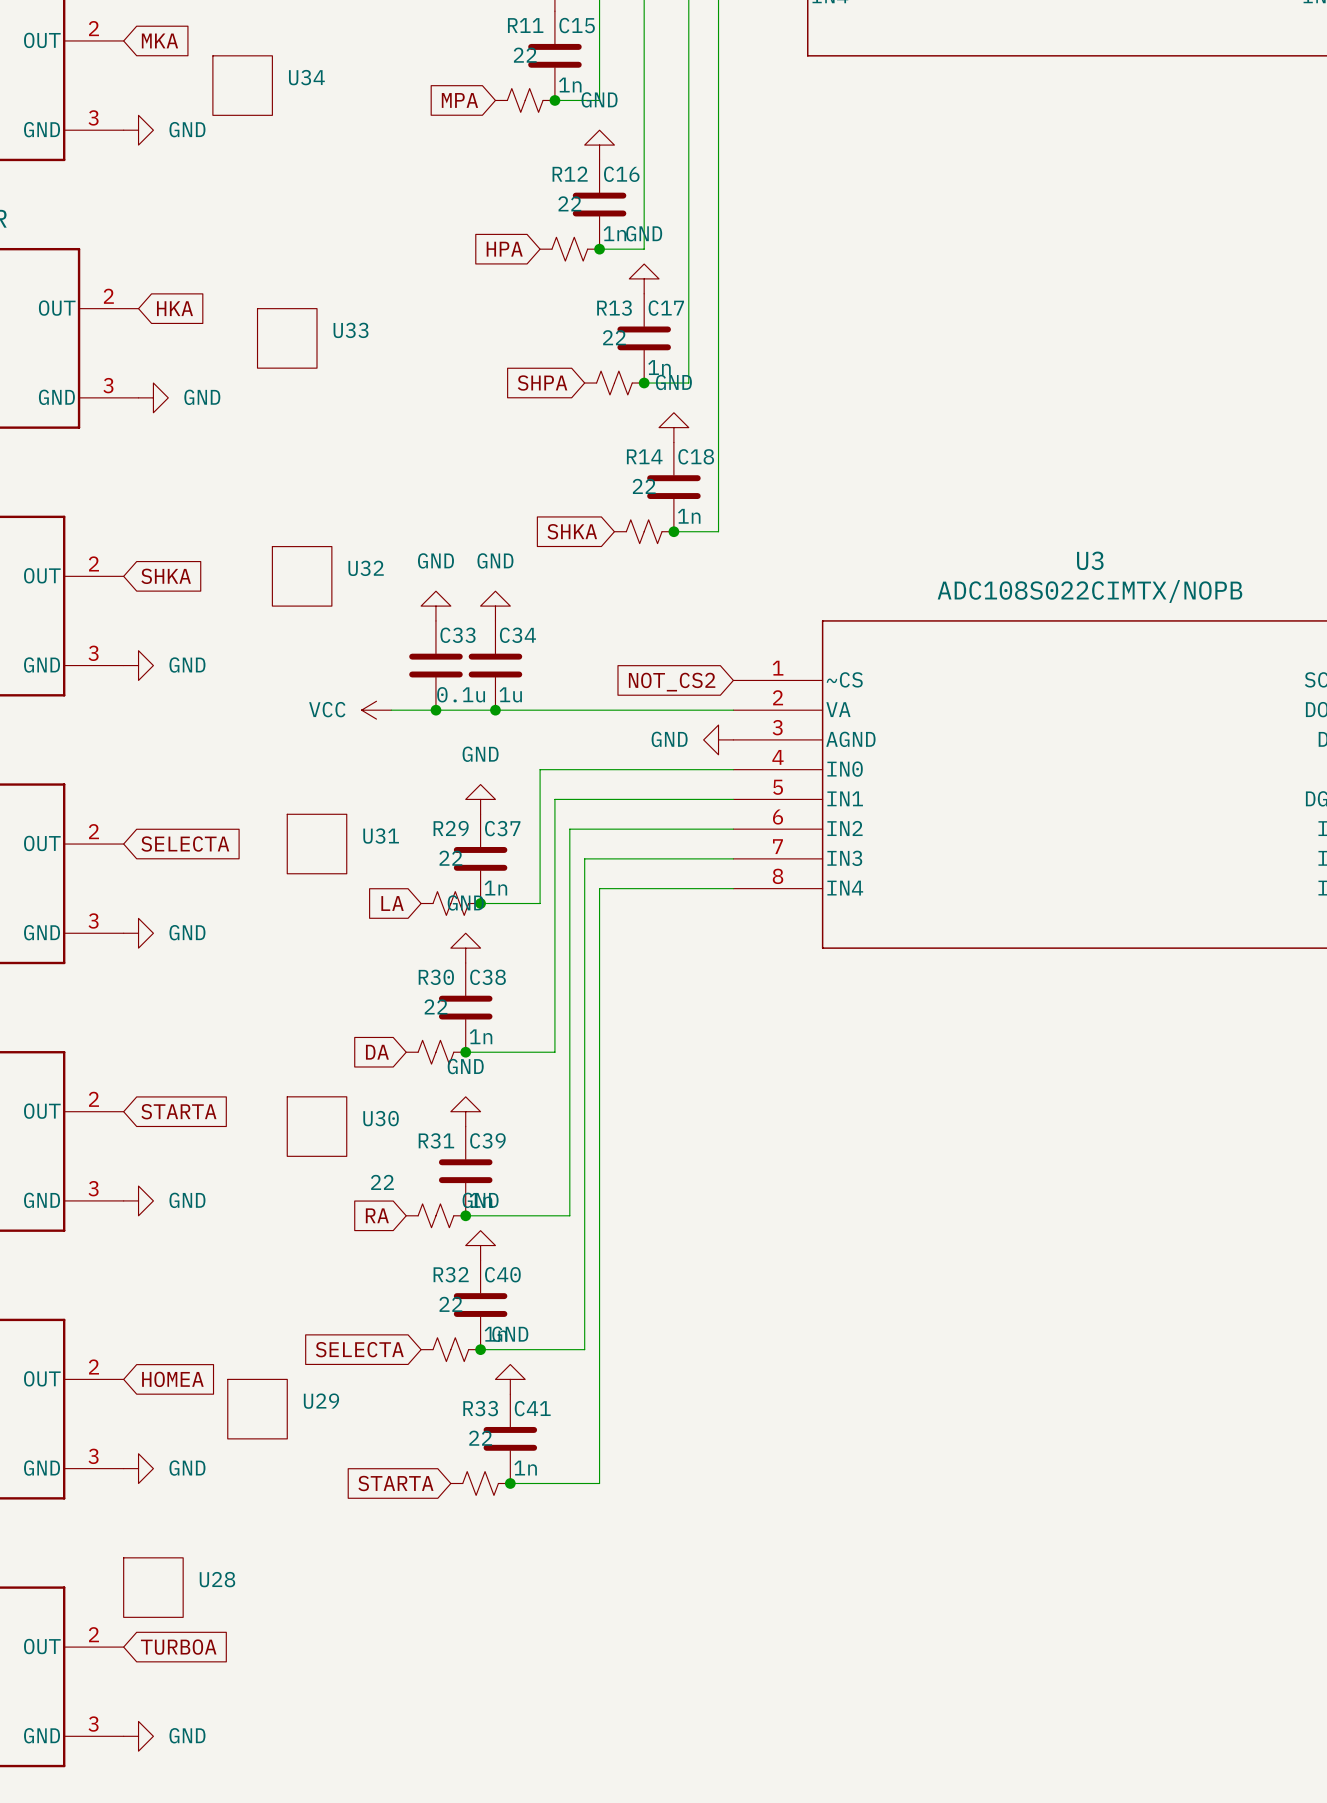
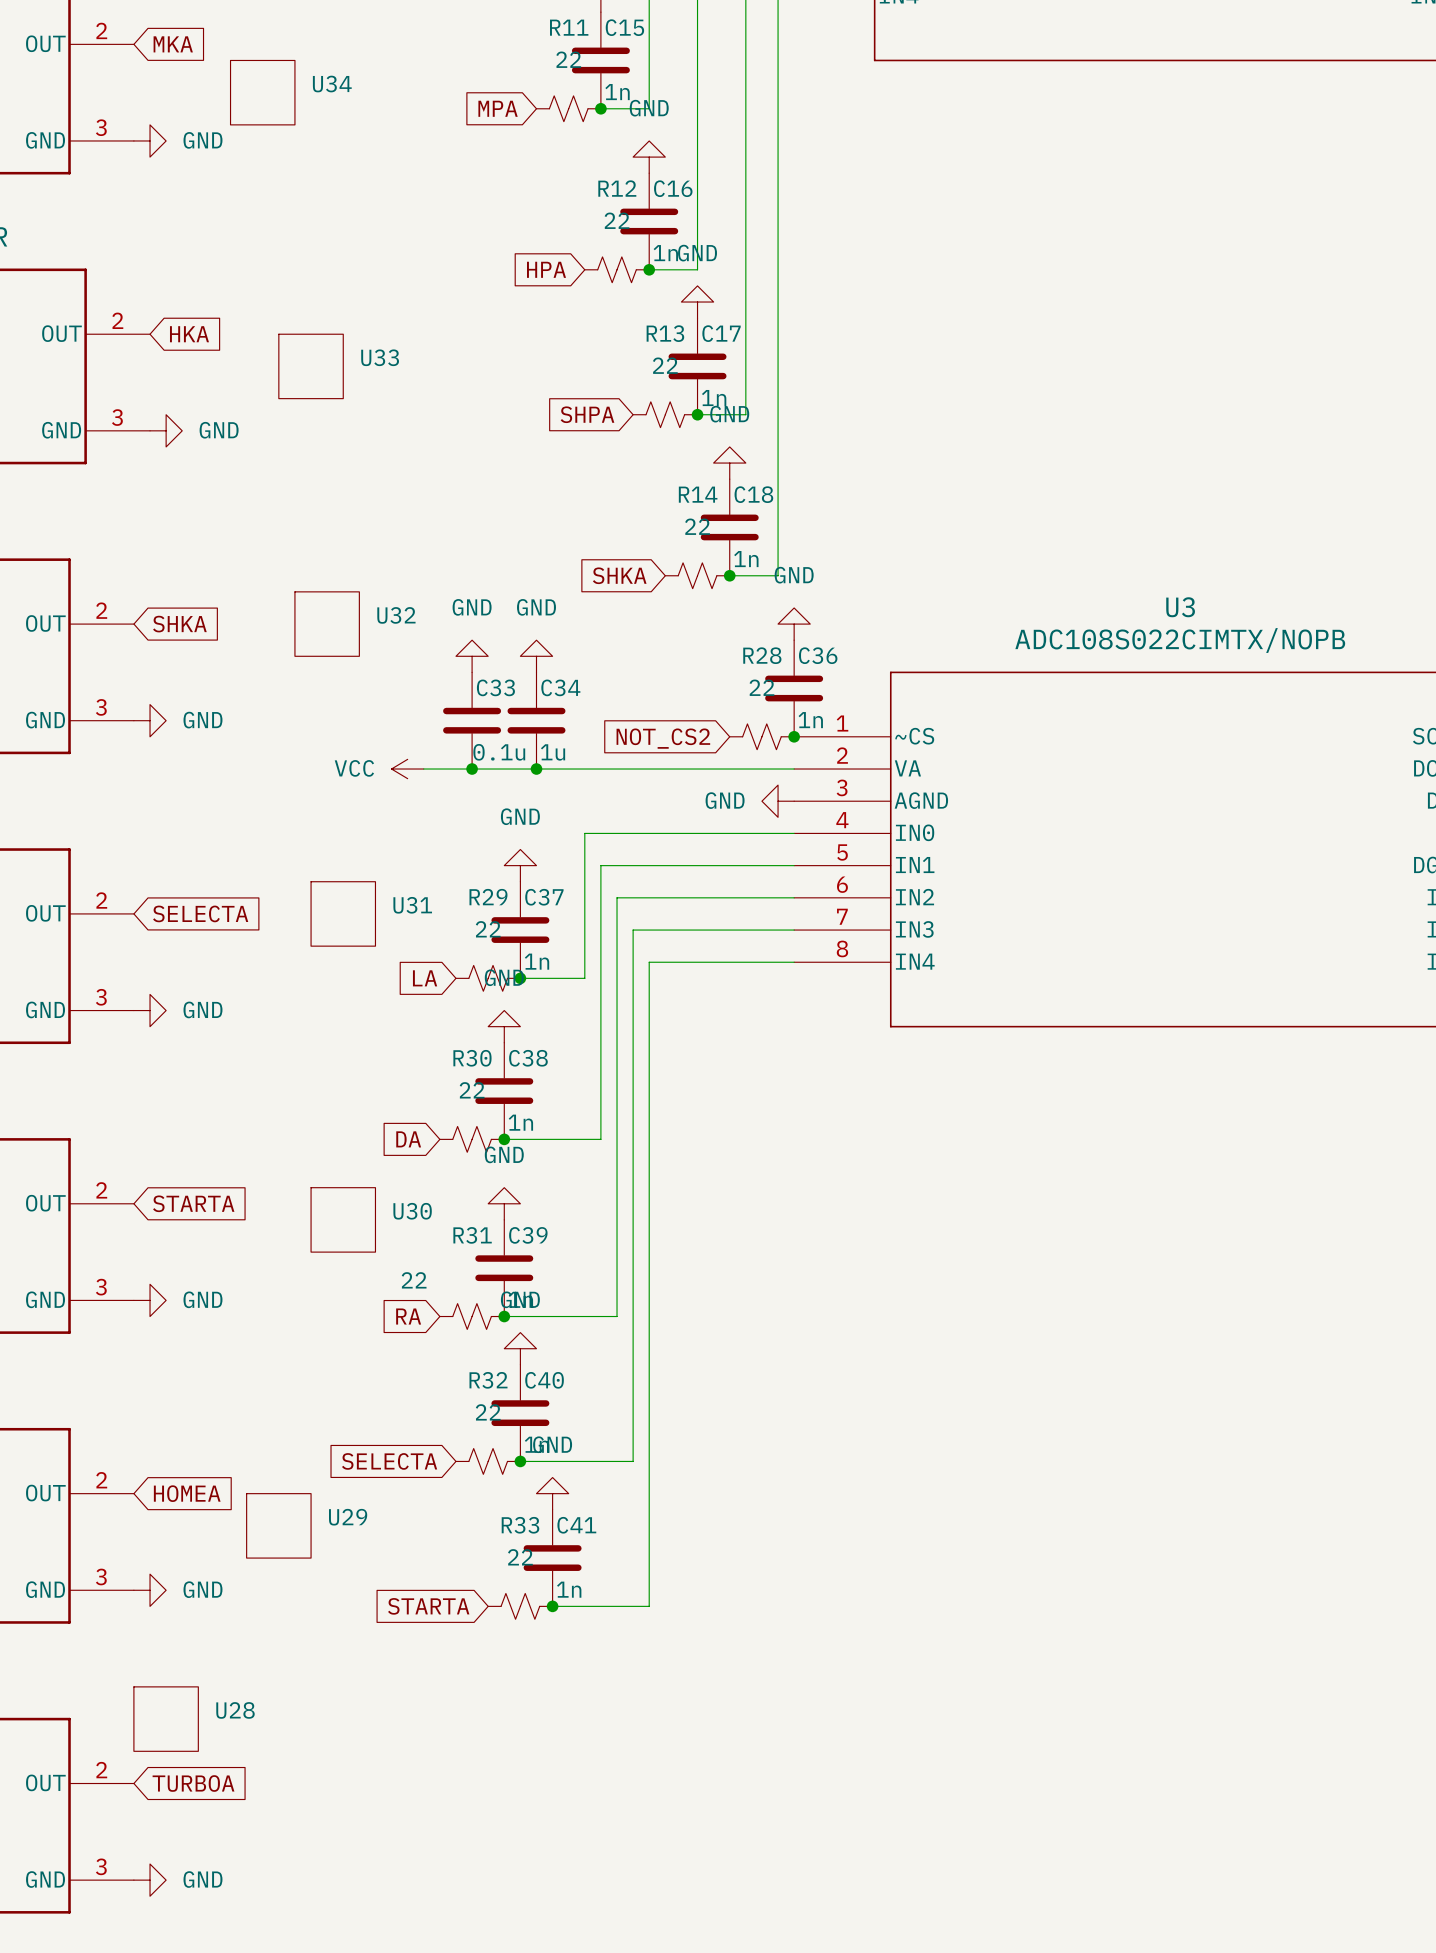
power symbol: none -> GND (794, 624)
C36: none -> 1n (794, 688)
R28: none -> 22 (761, 736)
junction: none -> (794, 736)
global label position: NOT_CS2 (672, 682) -> NOT_CS2 (663, 738)

